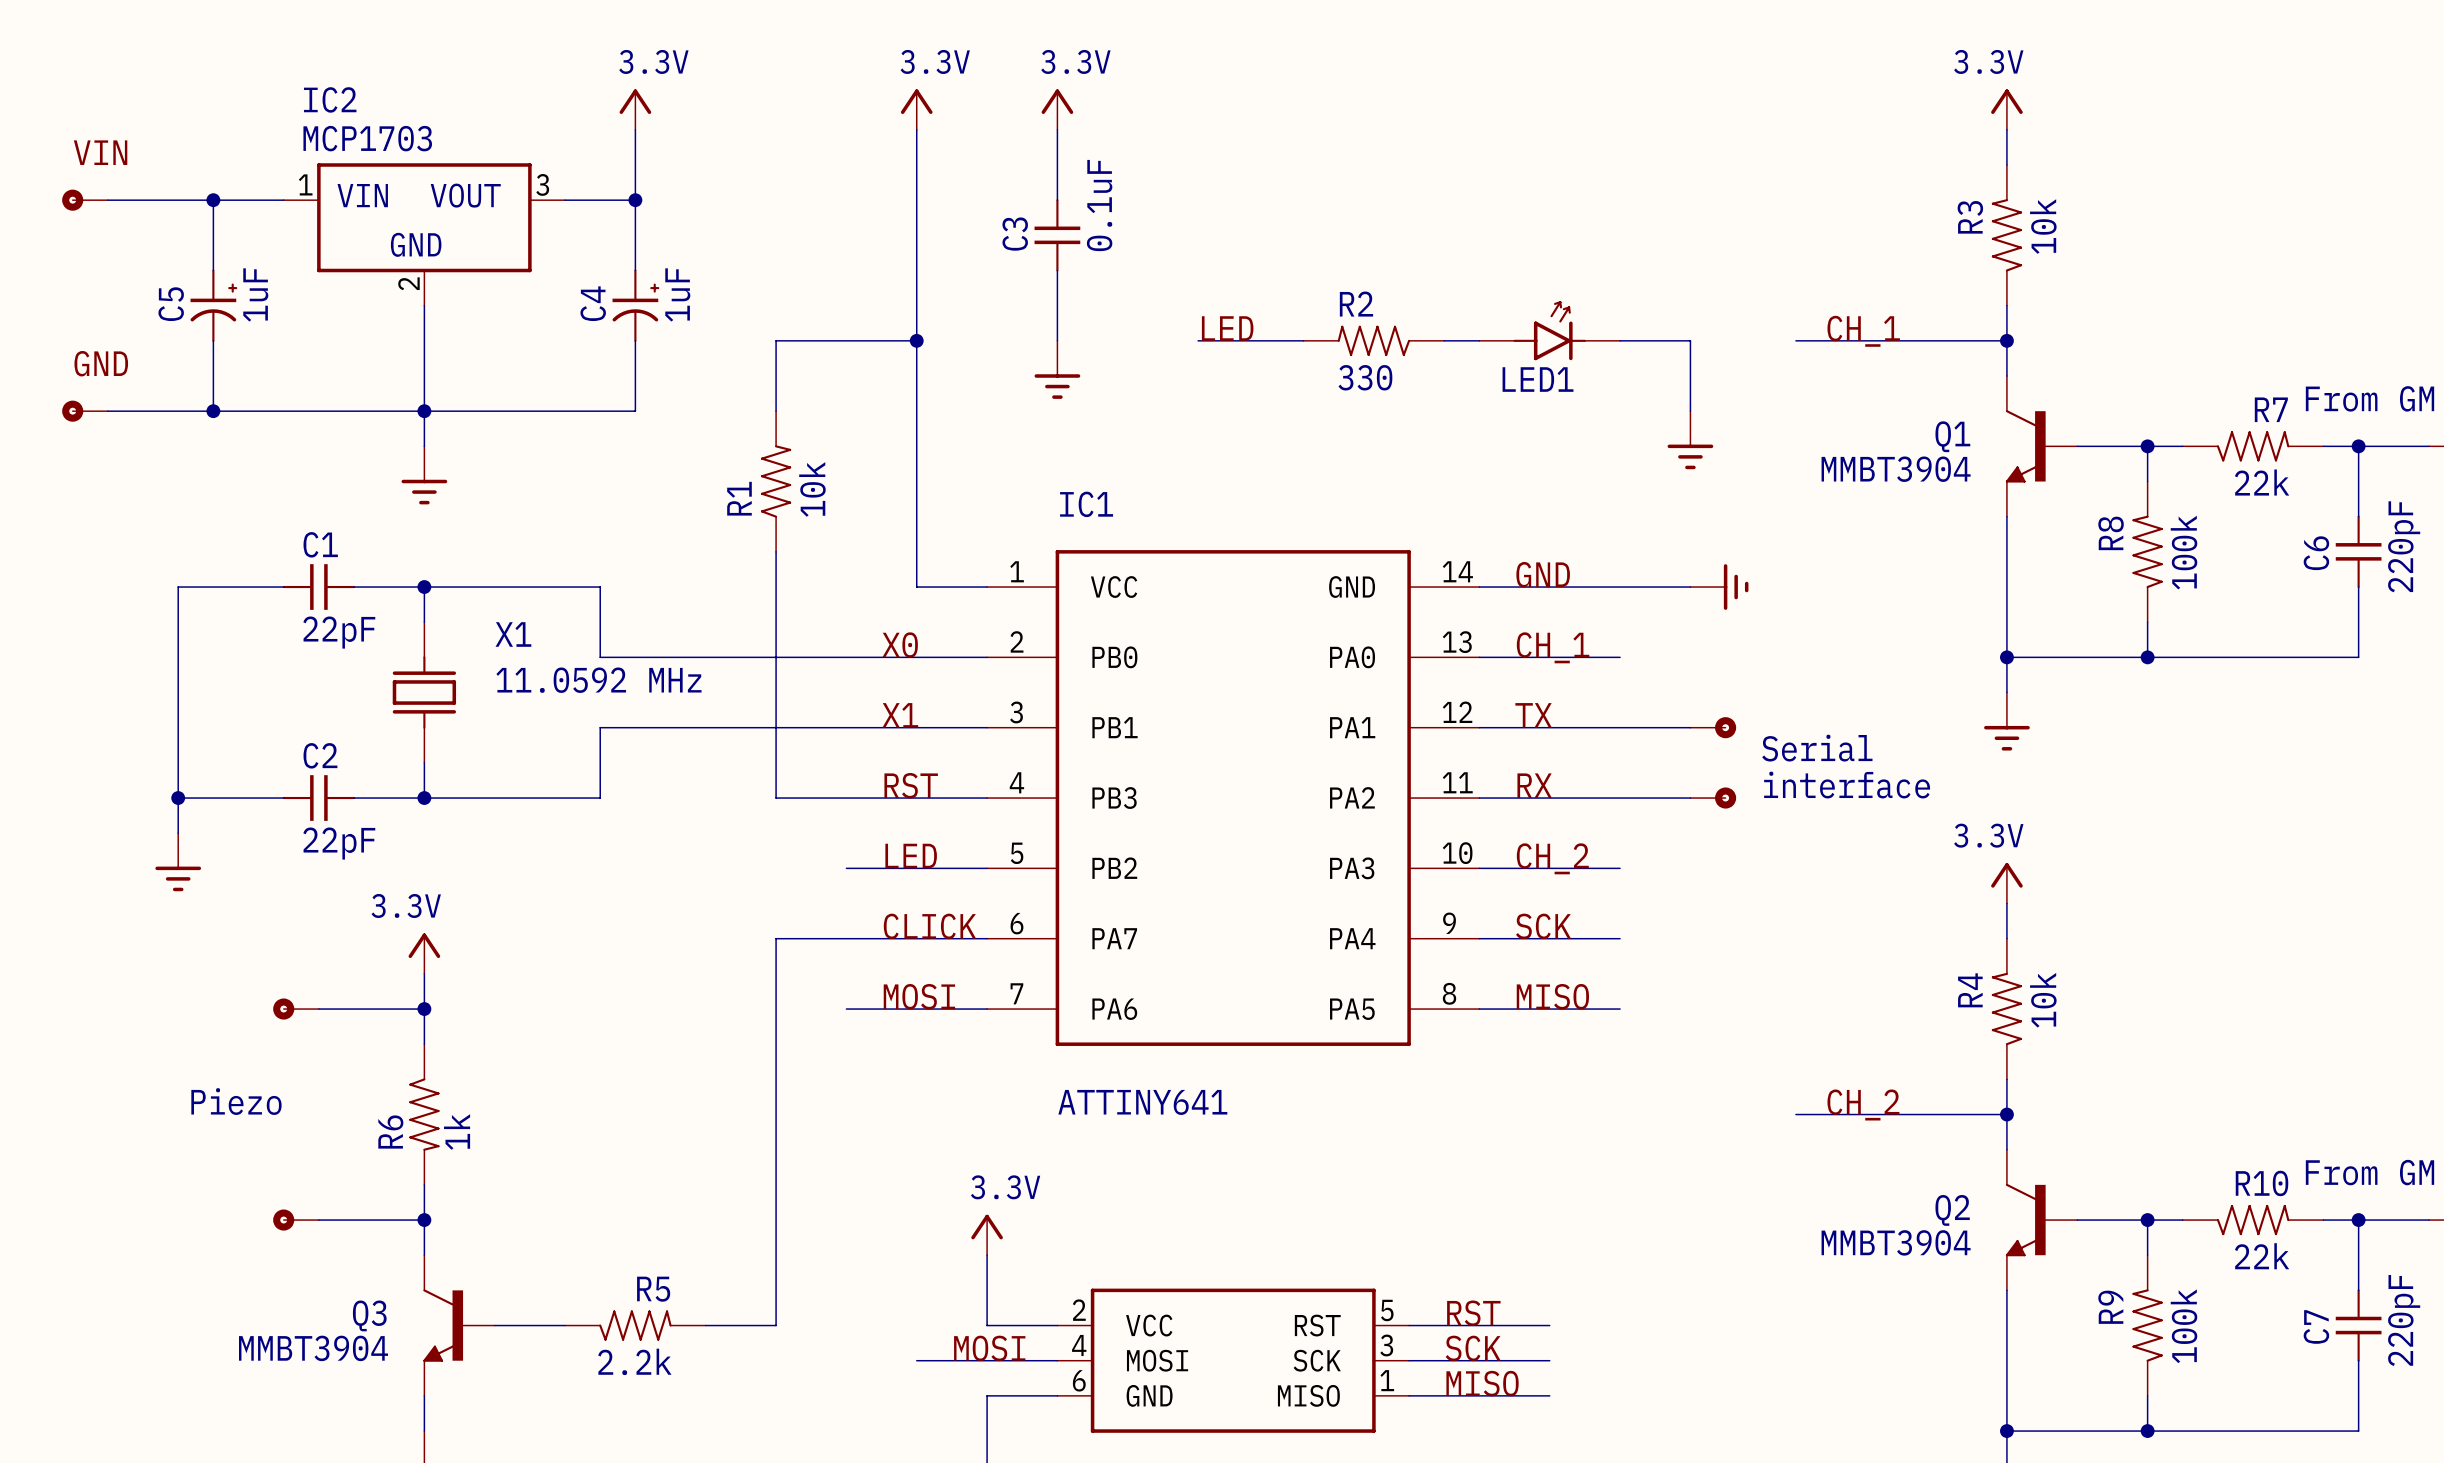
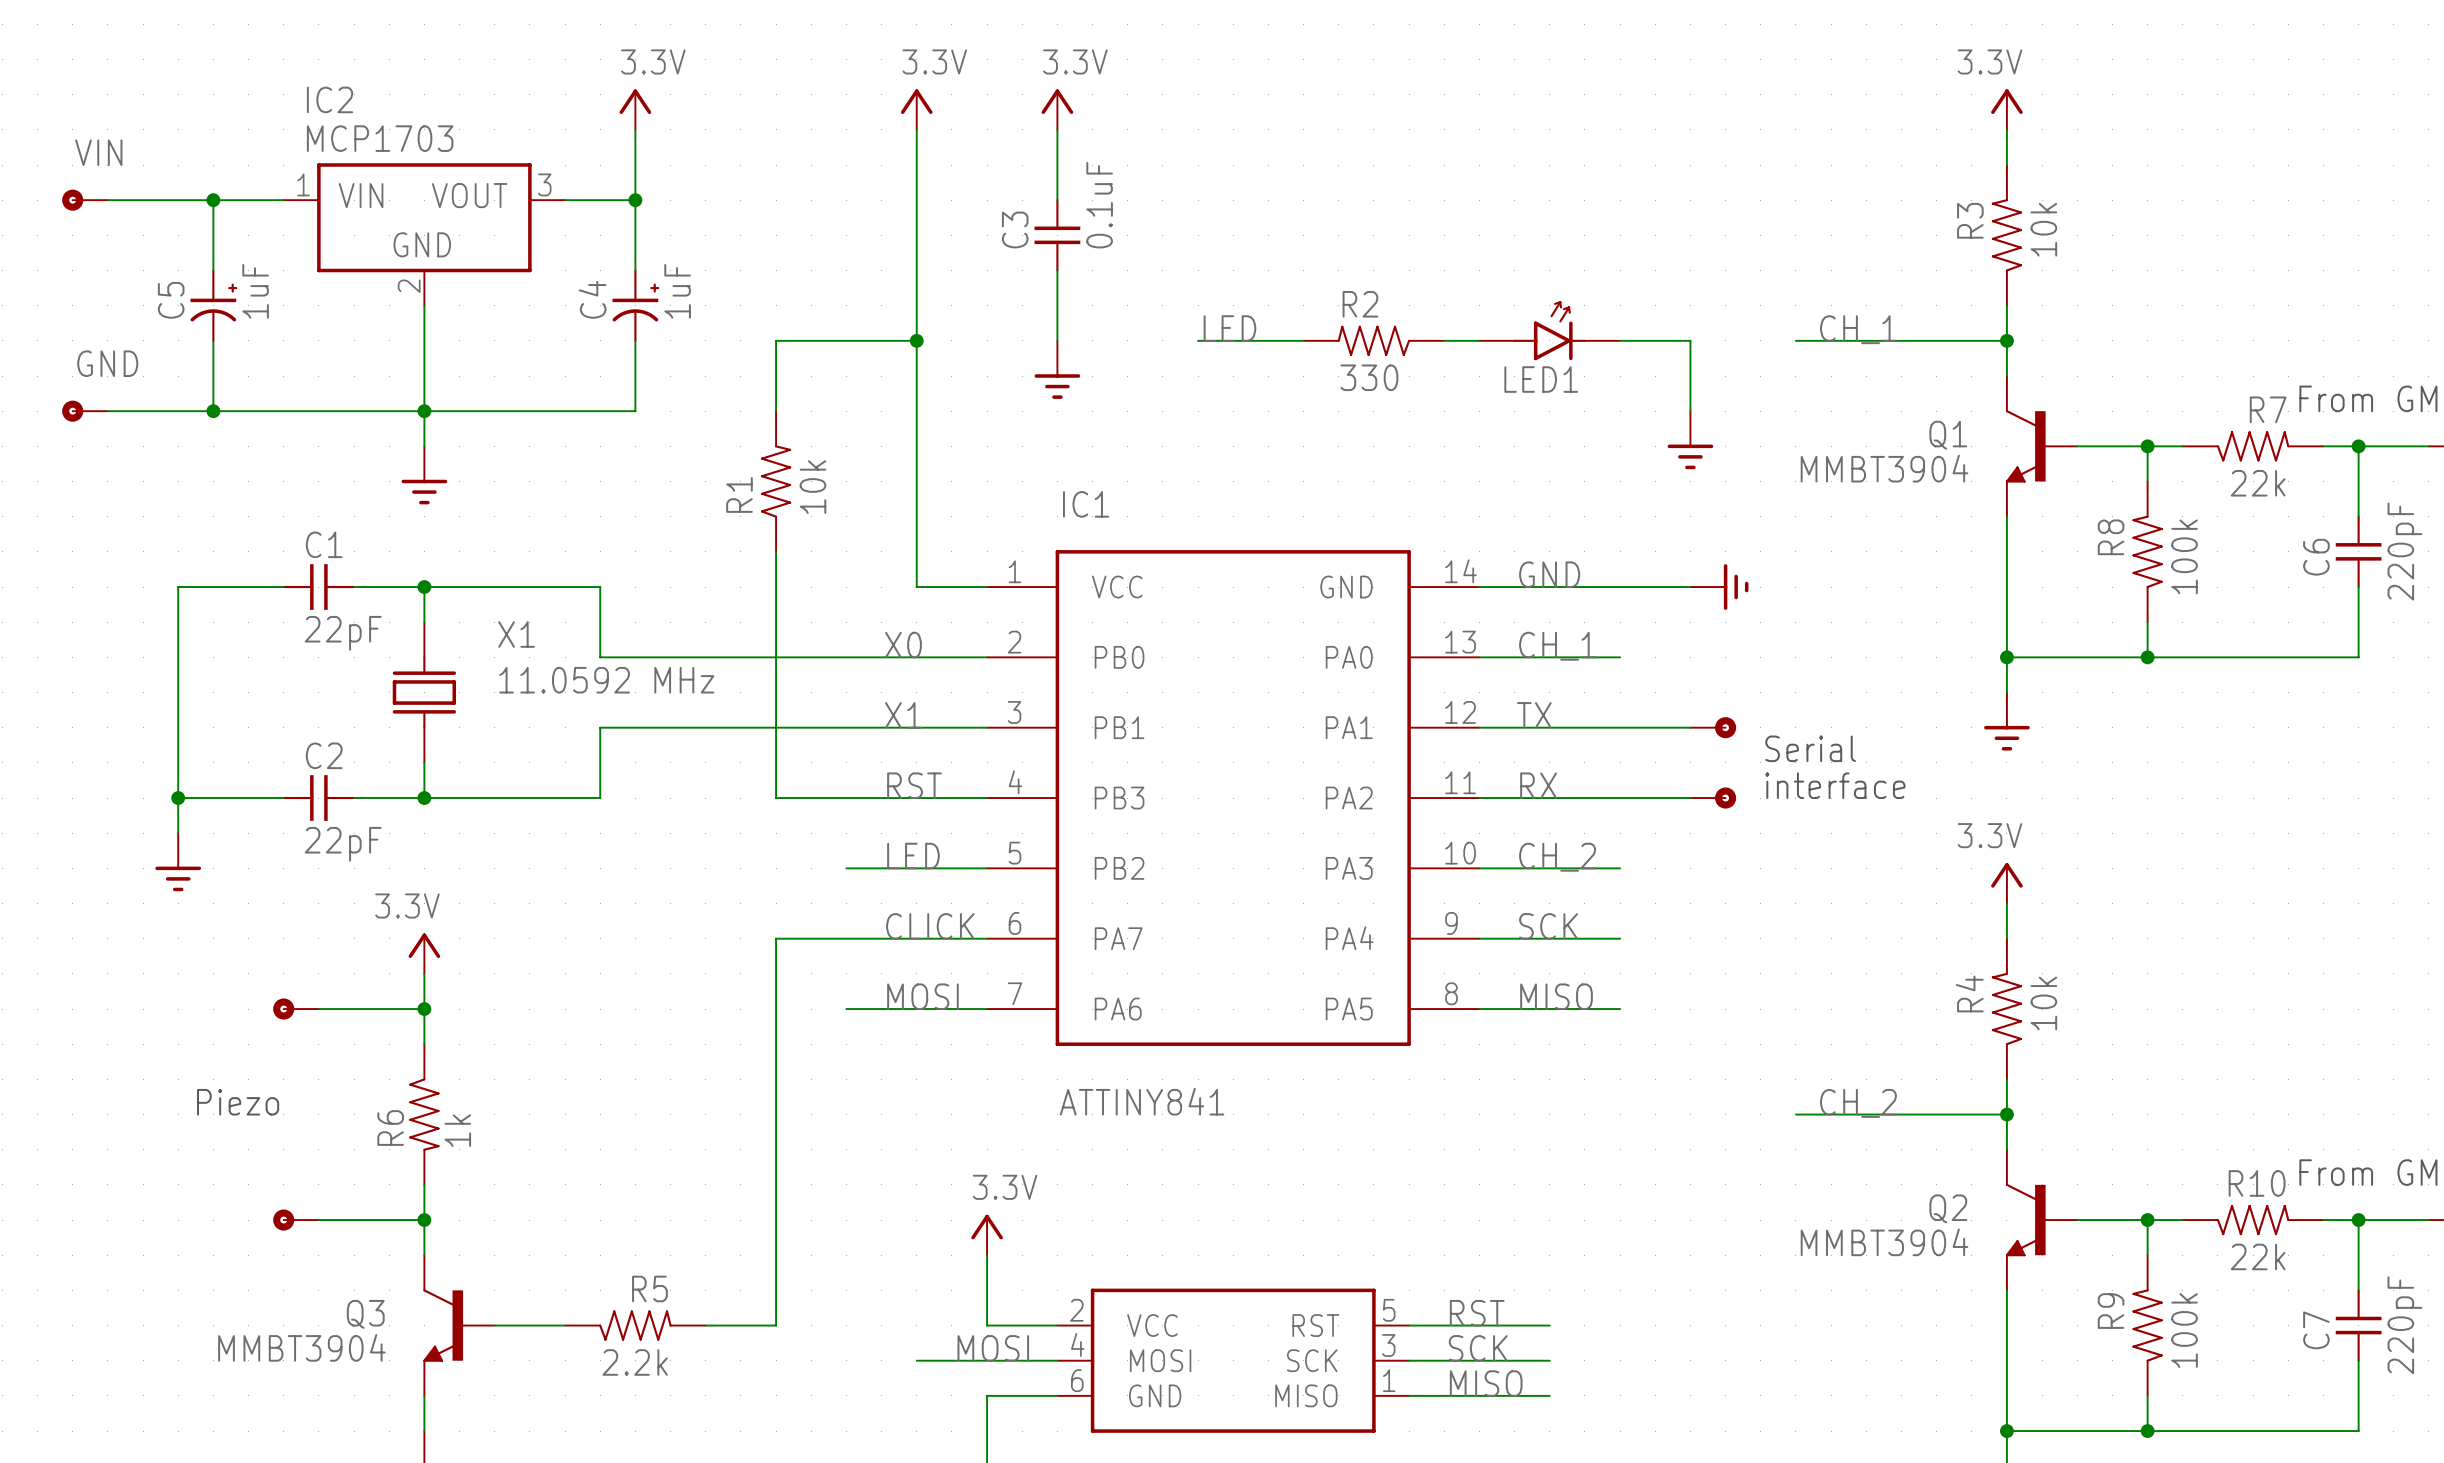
IC1 value: ATTINY641 (1142, 1102) -> ATTINY841 (1142, 1101)

